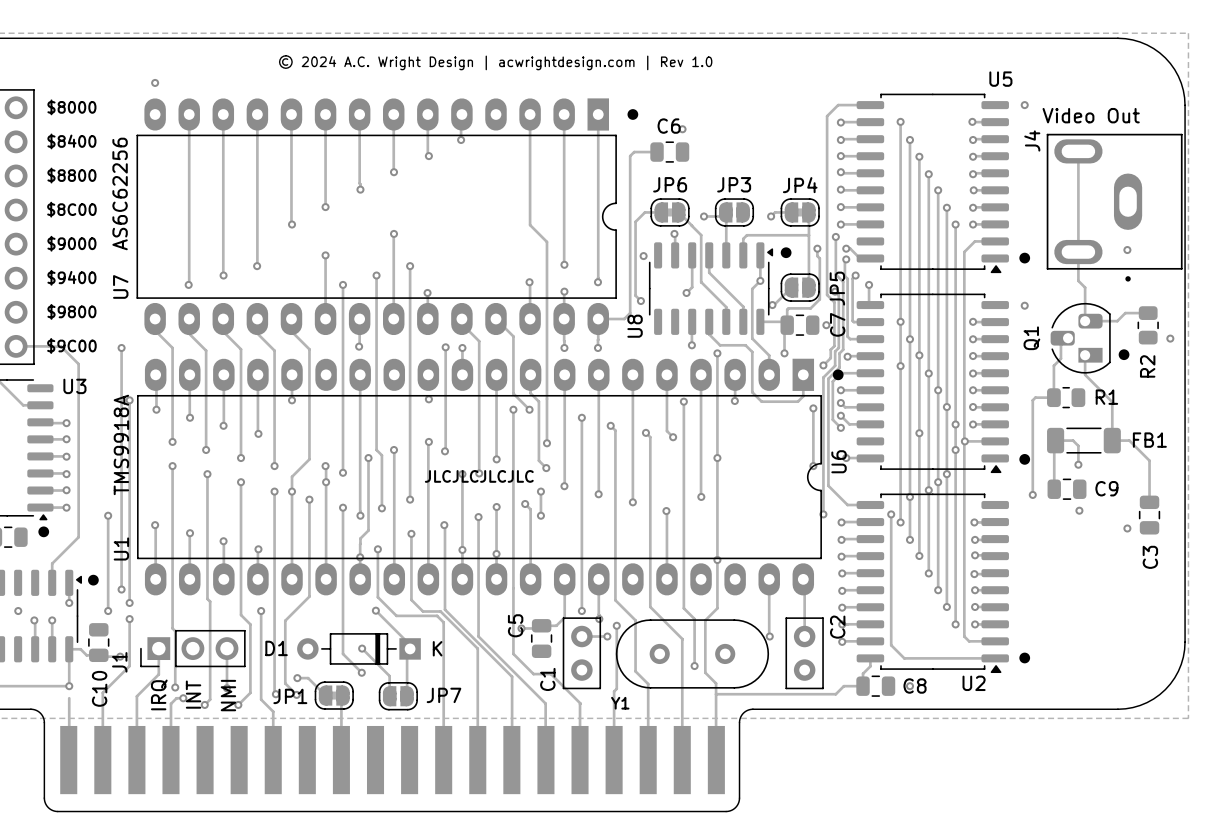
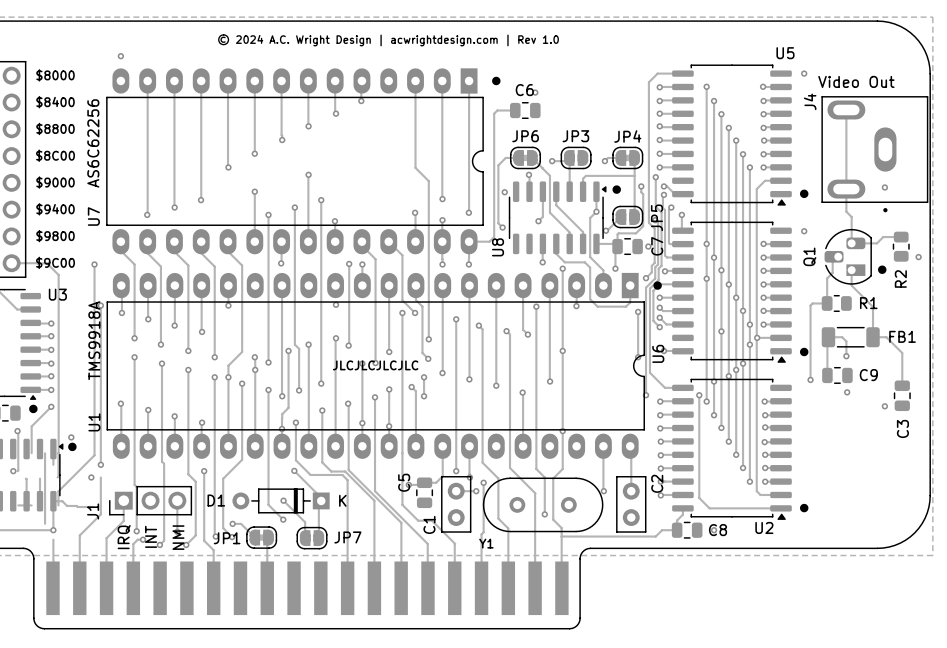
track: (75, 361) (78, 364) (78, 537) (52, 563) (52, 582) -> (58, 275) (57, 477)
track: (108, 515) (108, 611) -> none
via: (108, 515) -> none
track: none -> (51, 406) (31, 426) (31, 453)
via: none -> (51, 406)
track: none -> (17, 431) (17, 471)
via: none -> (17, 431)
via: none -> (71, 437)
track: none -> (45, 453) (45, 523)
track: none -> (94, 454) (58, 491) (58, 505)
via: (121, 589) -> none
via: (69, 602) -> none
via: (108, 611) -> none
via: none -> (91, 477)
via: (129, 619) -> none
via: (34, 620) -> none
via: (52, 620) -> none
C10: (98, 642) -> none
track: none -> (18, 505) (31, 505)
via: (120, 656) -> none

